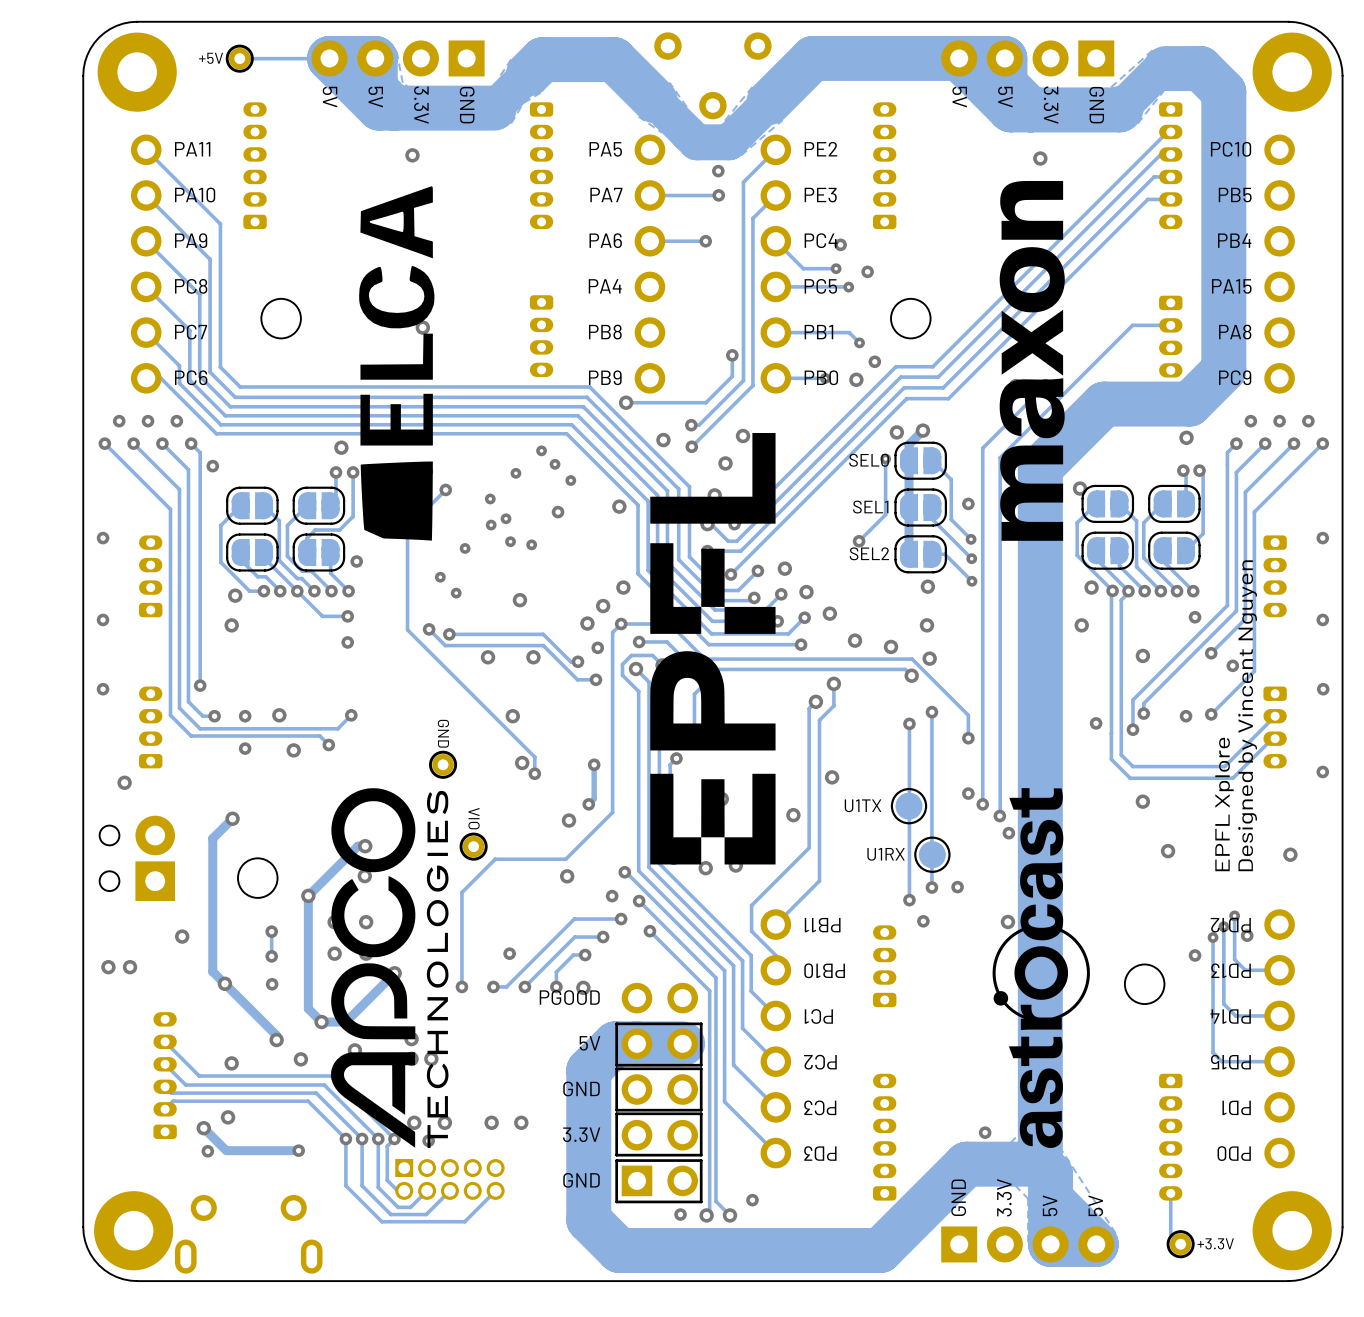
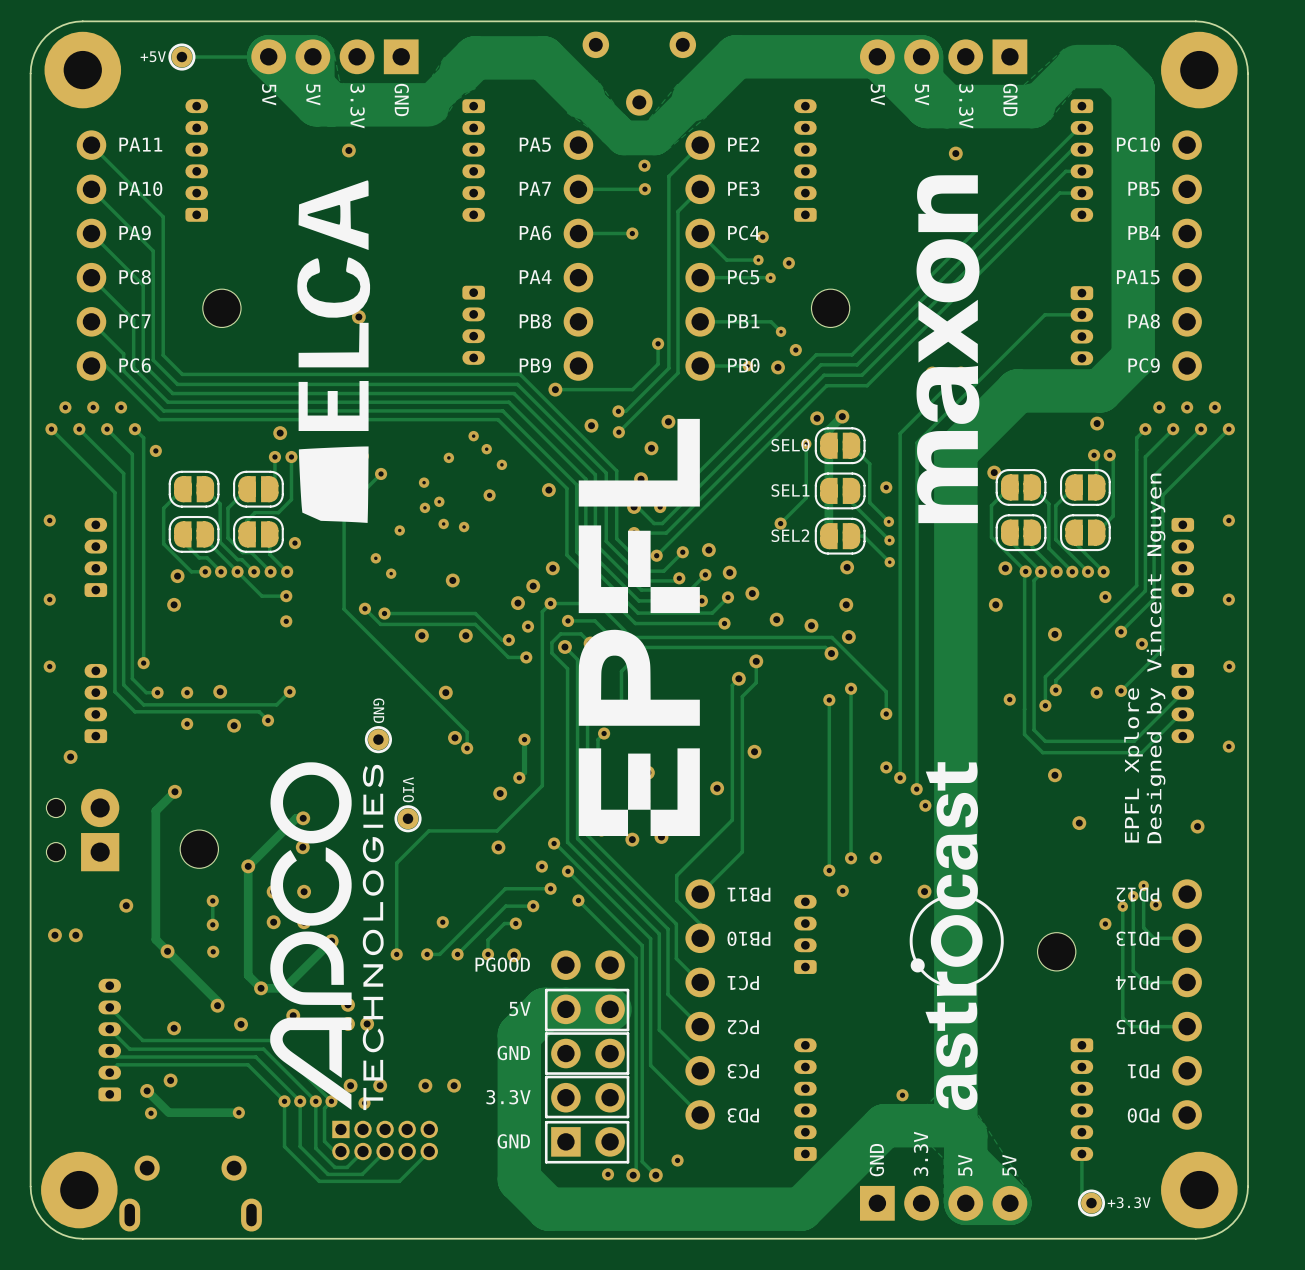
text: U1TX (863, 805) -> none
part: (909, 806) -> none
text: U1RX (886, 854) -> none
part: (932, 854) -> none

